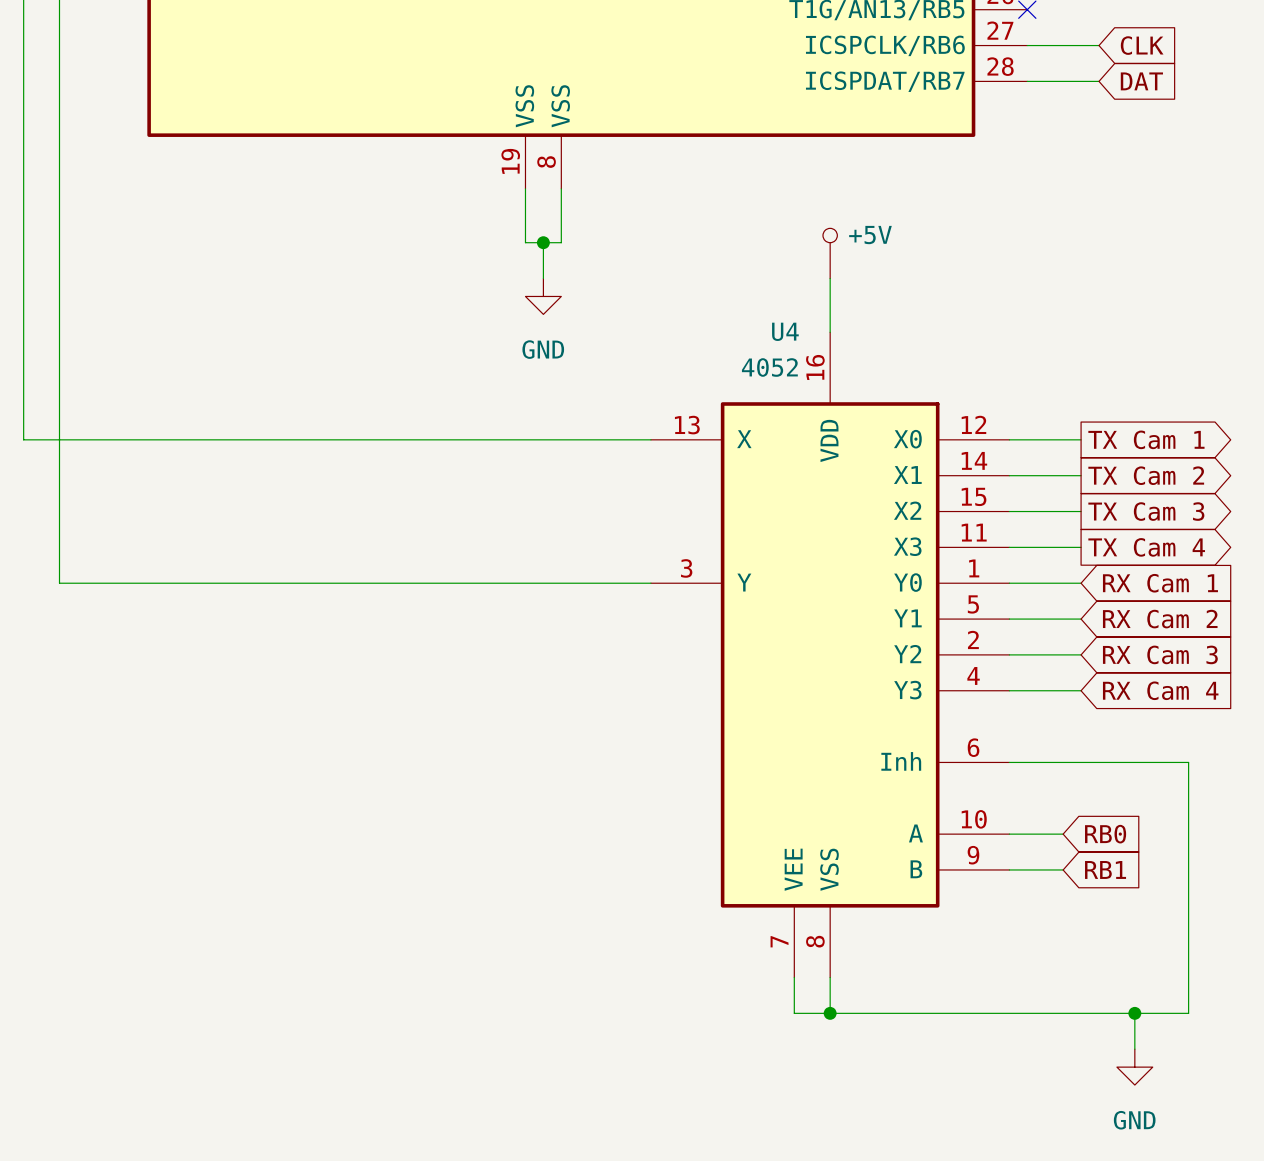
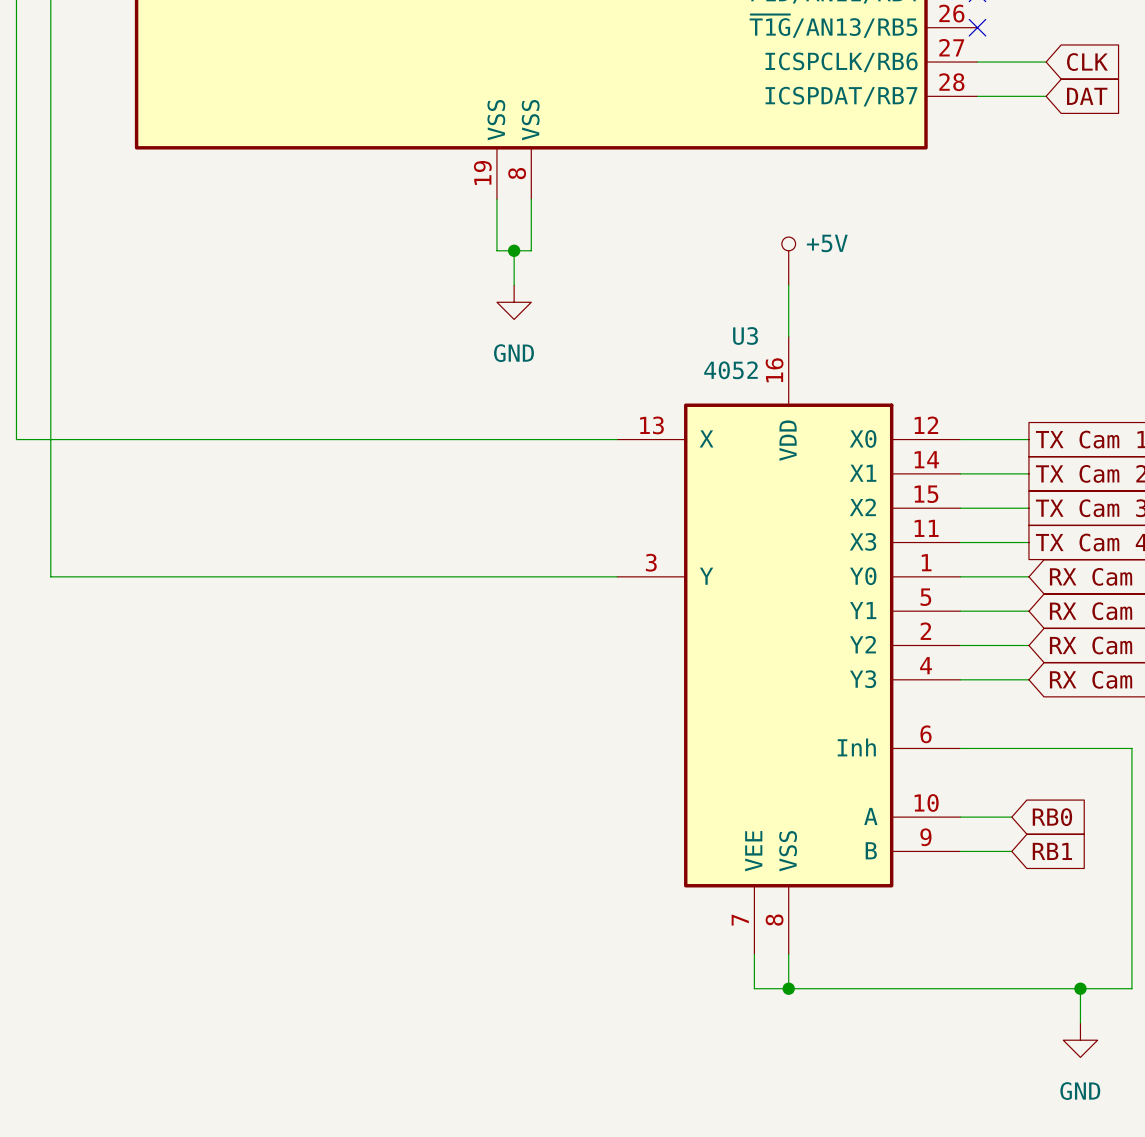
U4 name: U4 (785, 331) -> U3 (745, 335)

